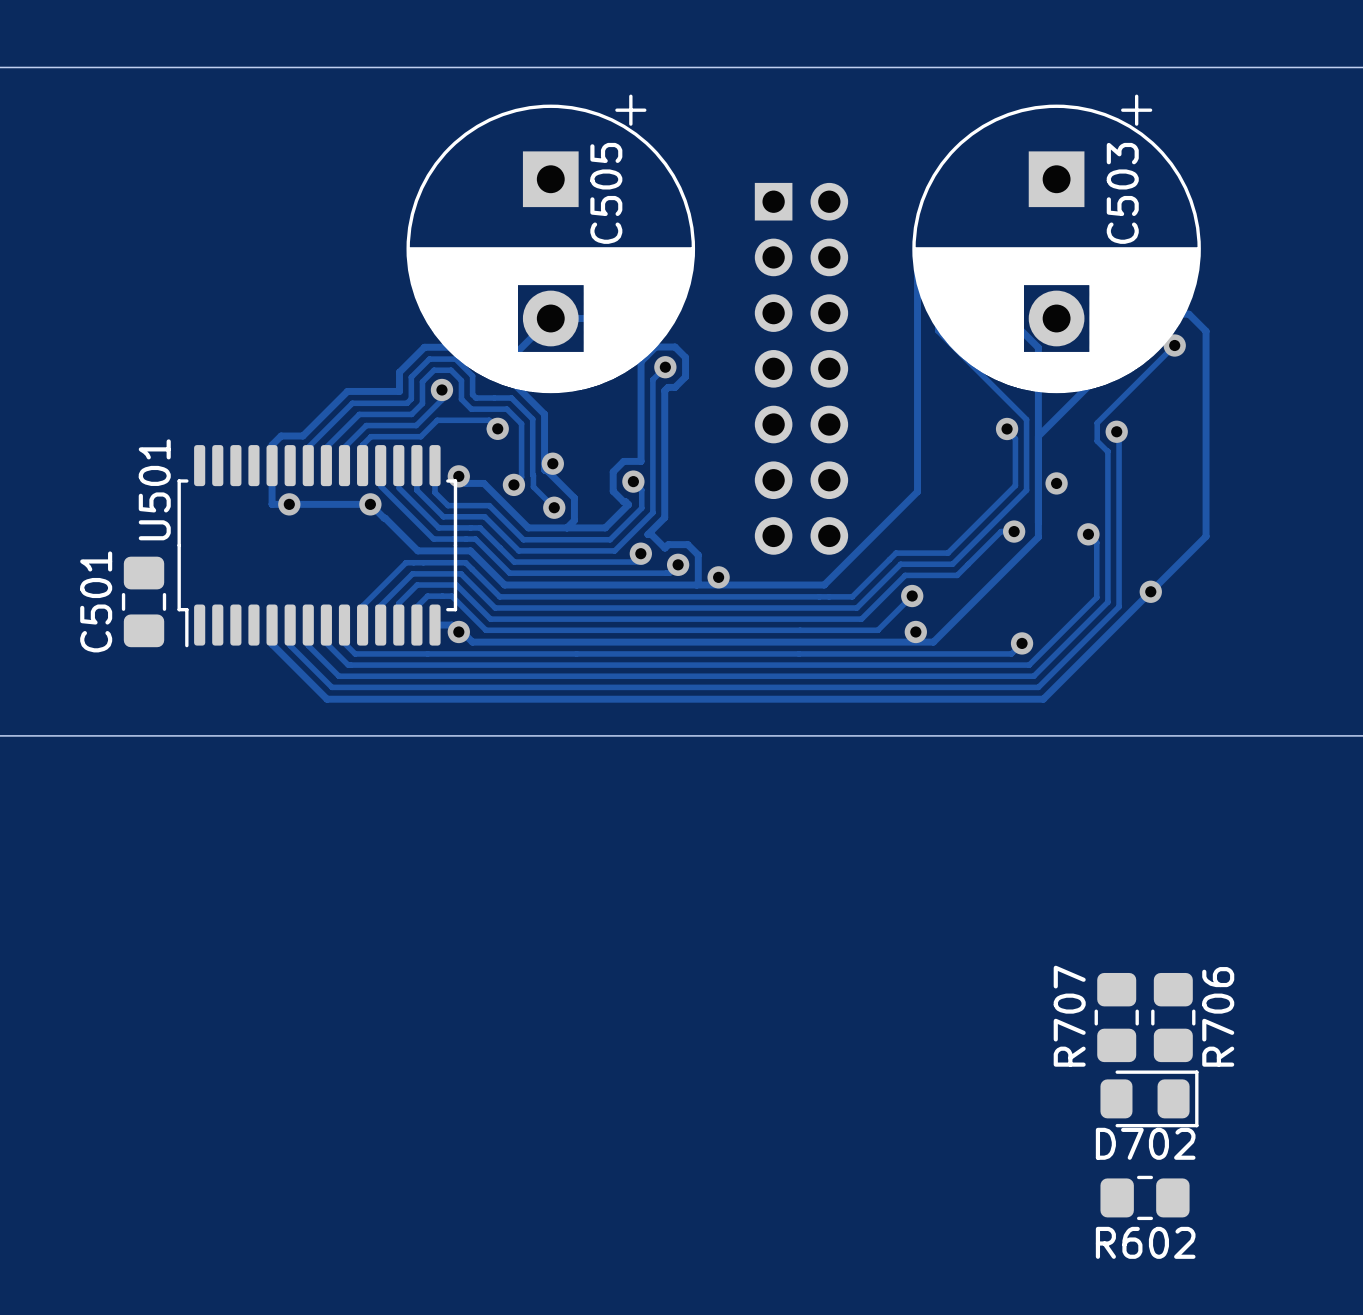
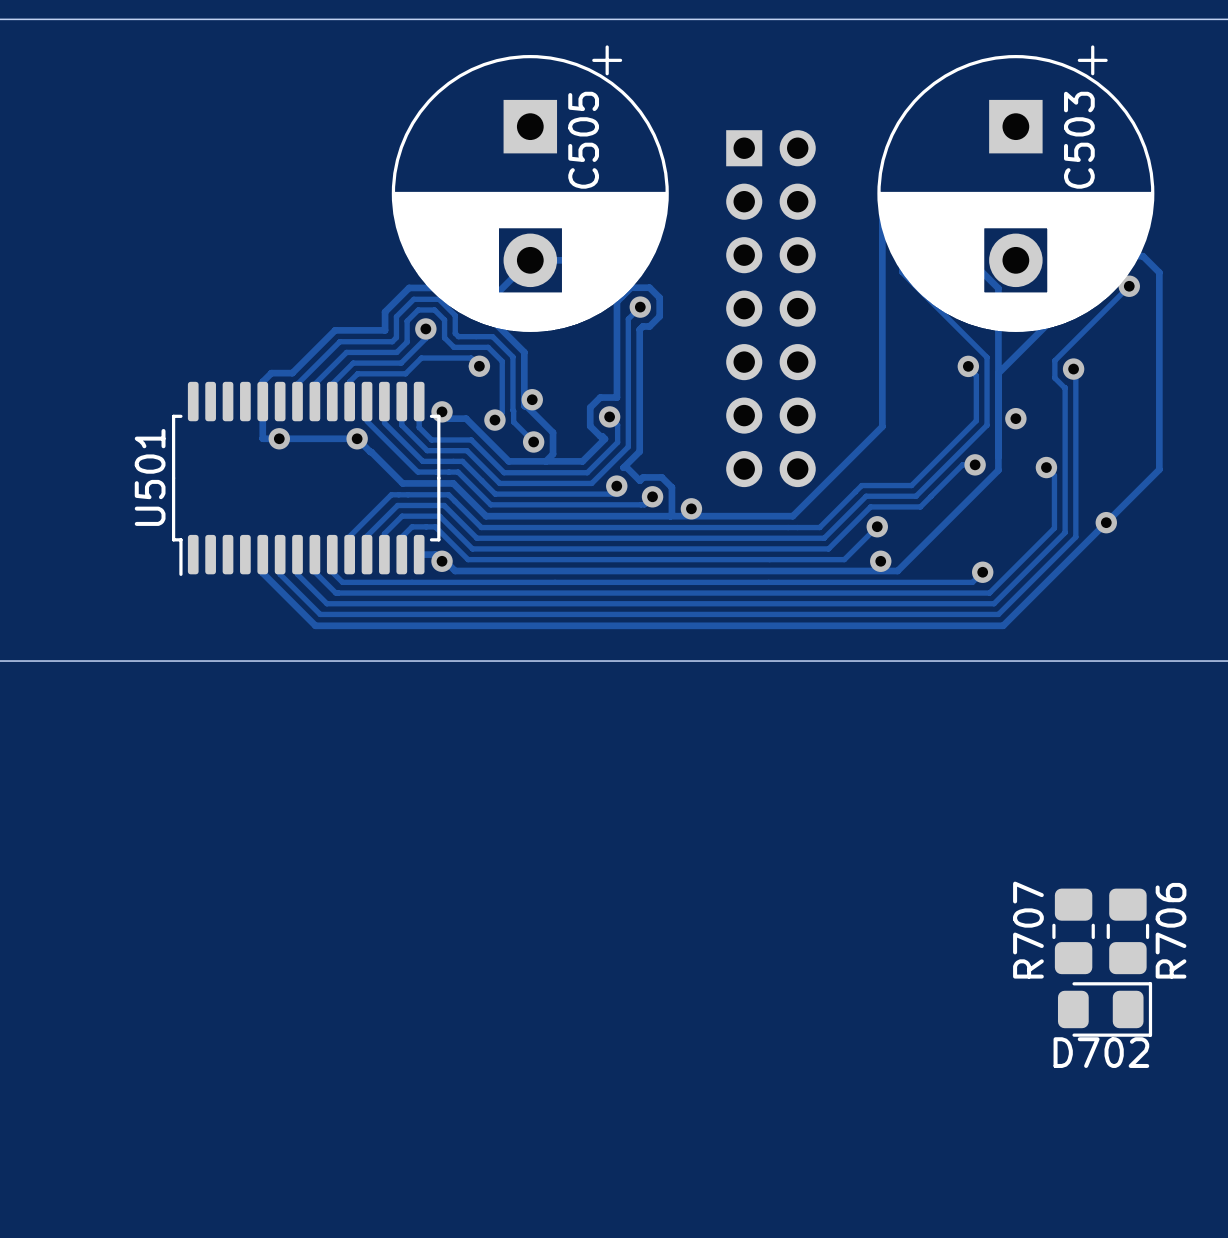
U501 name position: U501 (154, 489) -> U501 (150, 477)
C501: (144, 601) -> none
R602: (1145, 1197) -> none

